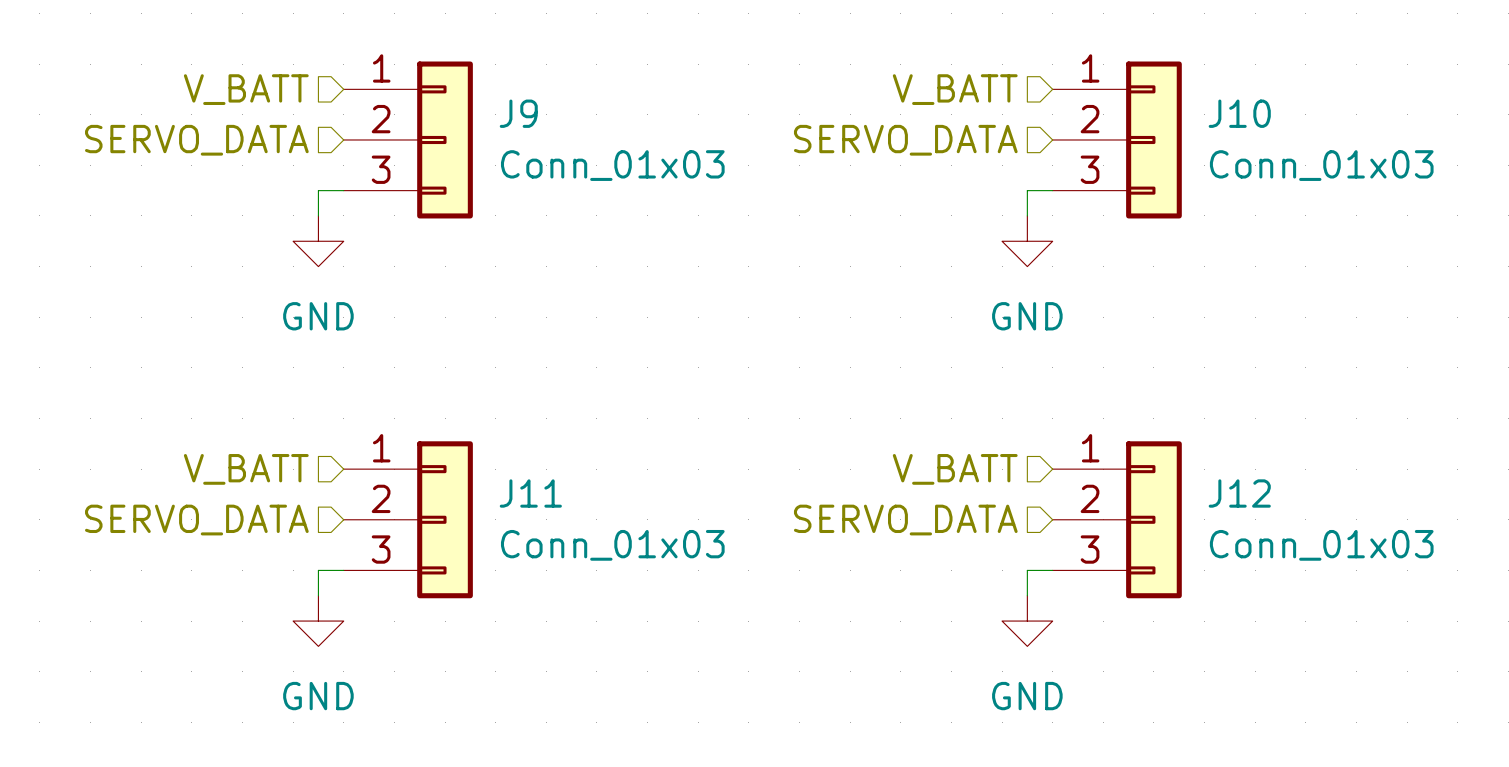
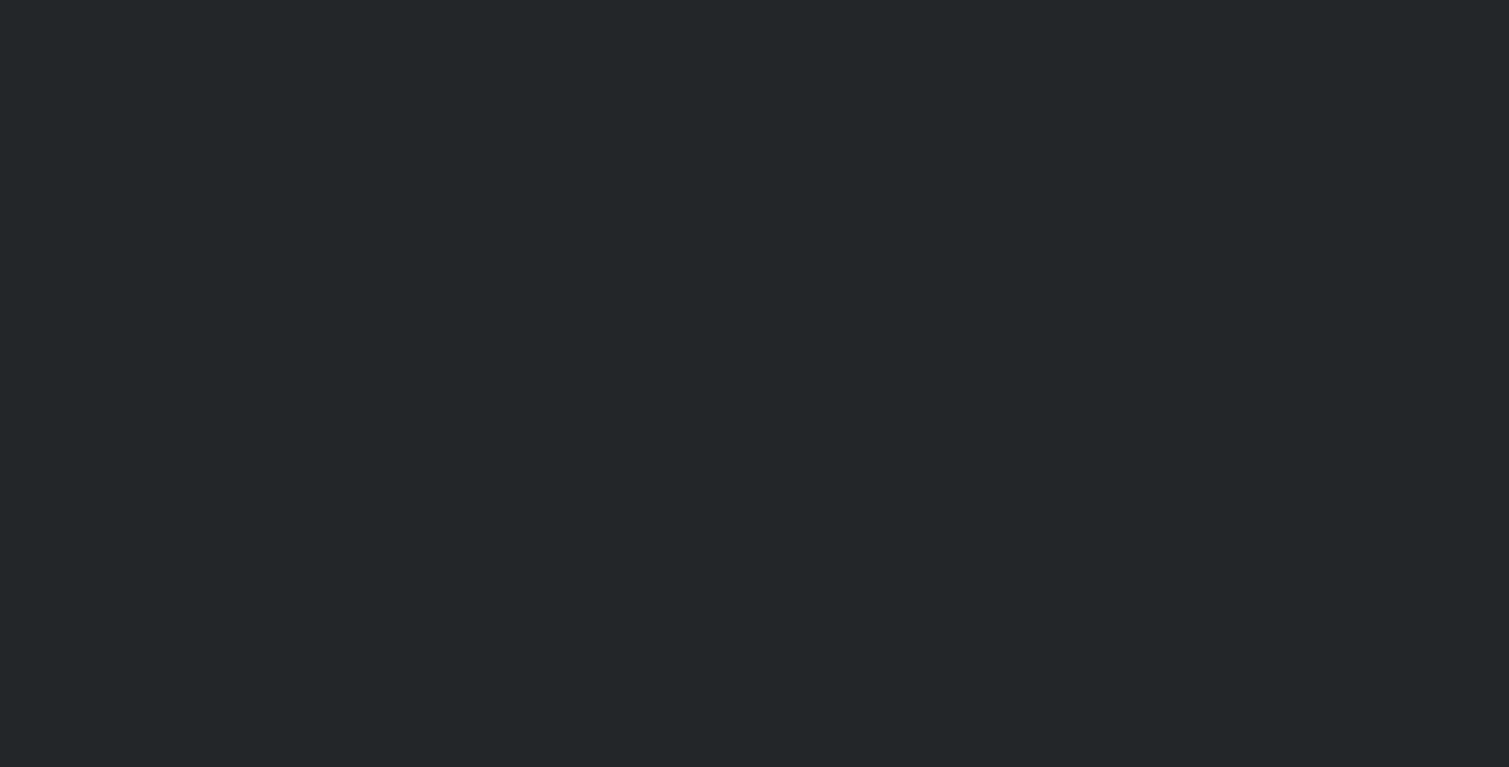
hierarchical label: V_BATT (246, 89) -> none
hierarchical label: V_BATT (955, 89) -> none
J9: Conn_01x03 (408, 139) -> none
J10: Conn_01x03 (1117, 139) -> none
hierarchical label: SERVO_DATA (196, 140) -> none
hierarchical label: SERVO_DATA (905, 140) -> none
wire: (343, 190) (318, 190) (318, 215) -> none
wire: (1052, 190) (1027, 190) (1027, 215) -> none
power symbol: GND (318, 241) -> none
power symbol: GND (1027, 241) -> none
hierarchical label: V_BATT (246, 469) -> none
hierarchical label: V_BATT (955, 469) -> none
J11: Conn_01x03 (408, 519) -> none
J12: Conn_01x03 (1117, 519) -> none
hierarchical label: SERVO_DATA (196, 520) -> none
hierarchical label: SERVO_DATA (905, 520) -> none
wire: (343, 570) (318, 570) (318, 595) -> none
wire: (1052, 570) (1027, 570) (1027, 595) -> none
power symbol: GND (318, 621) -> none
power symbol: GND (1027, 621) -> none

